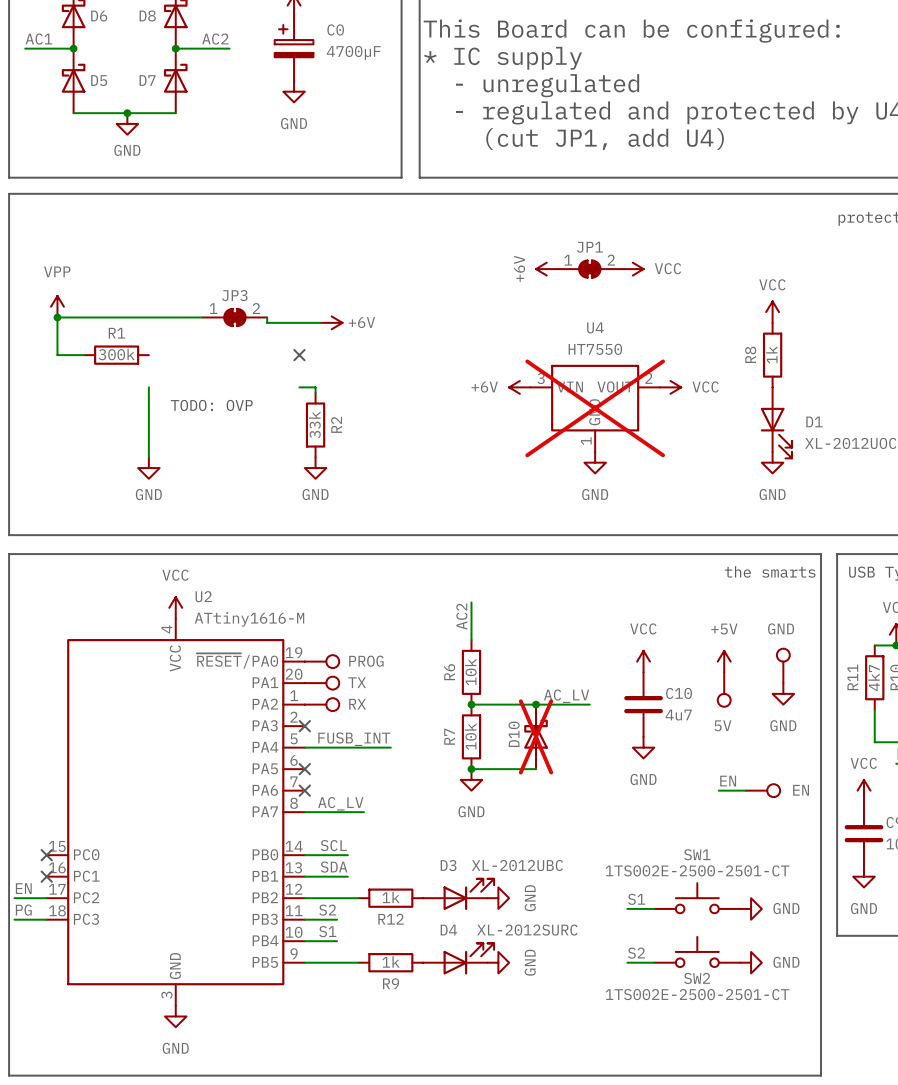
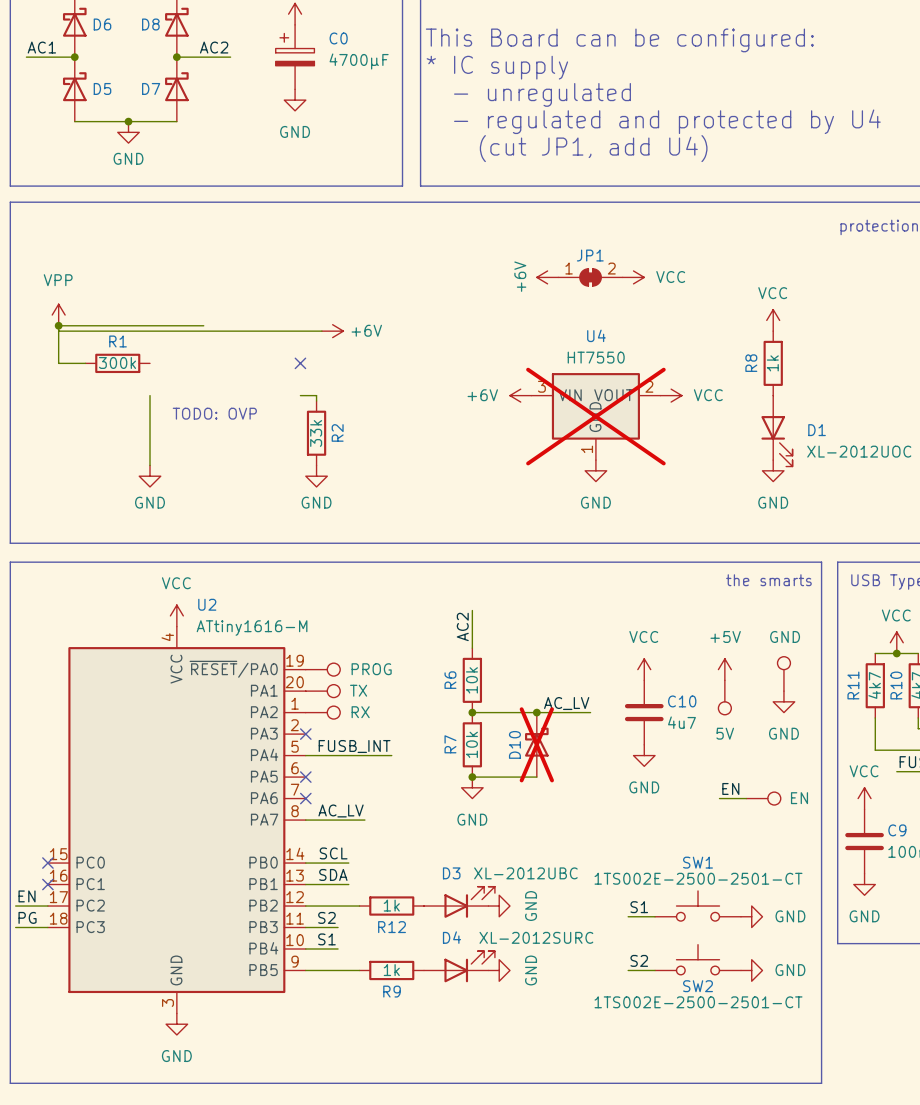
JP3: (234, 317) -> none
wire: (267, 317) (267, 322) -> (58, 331) (268, 331)

